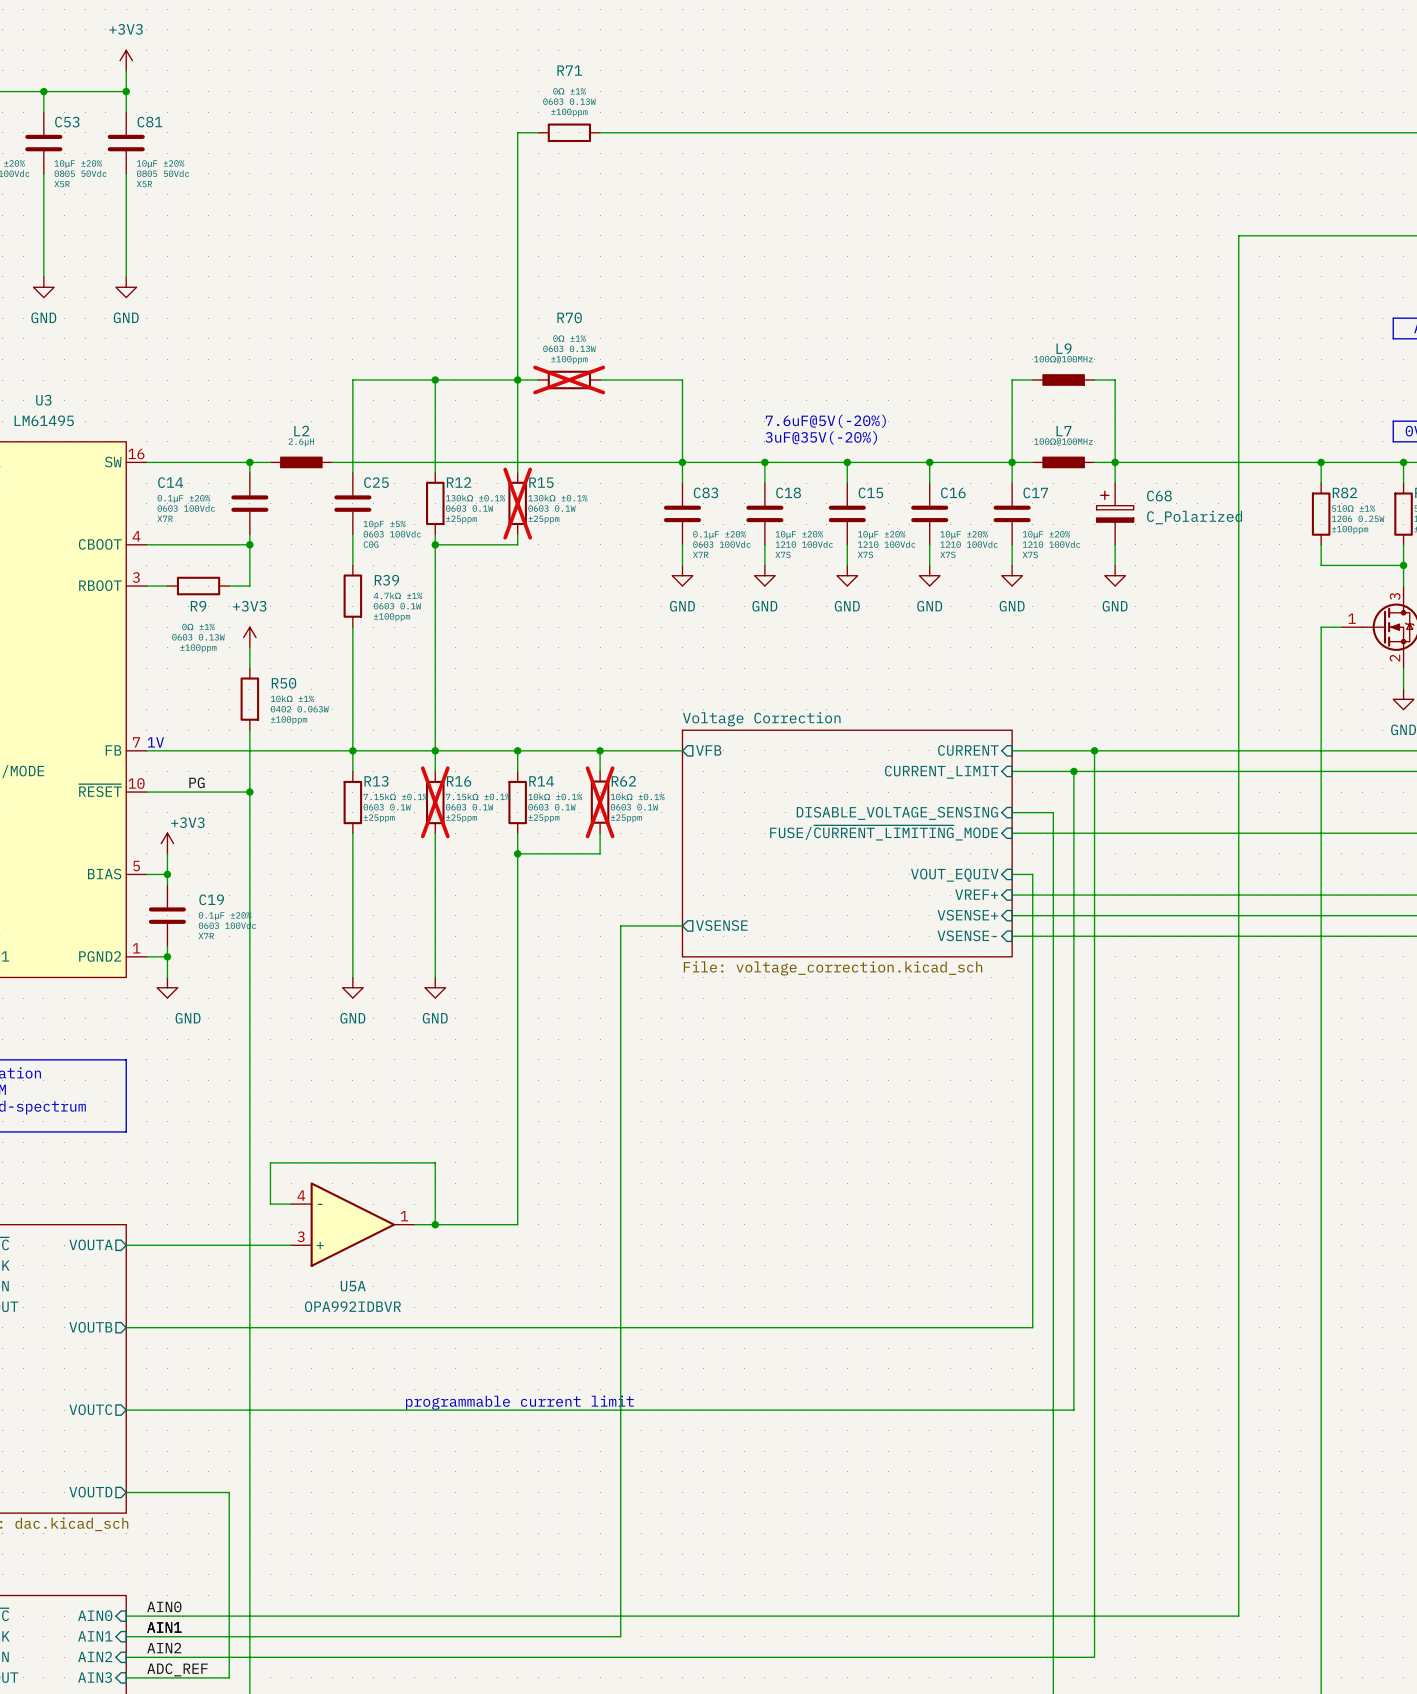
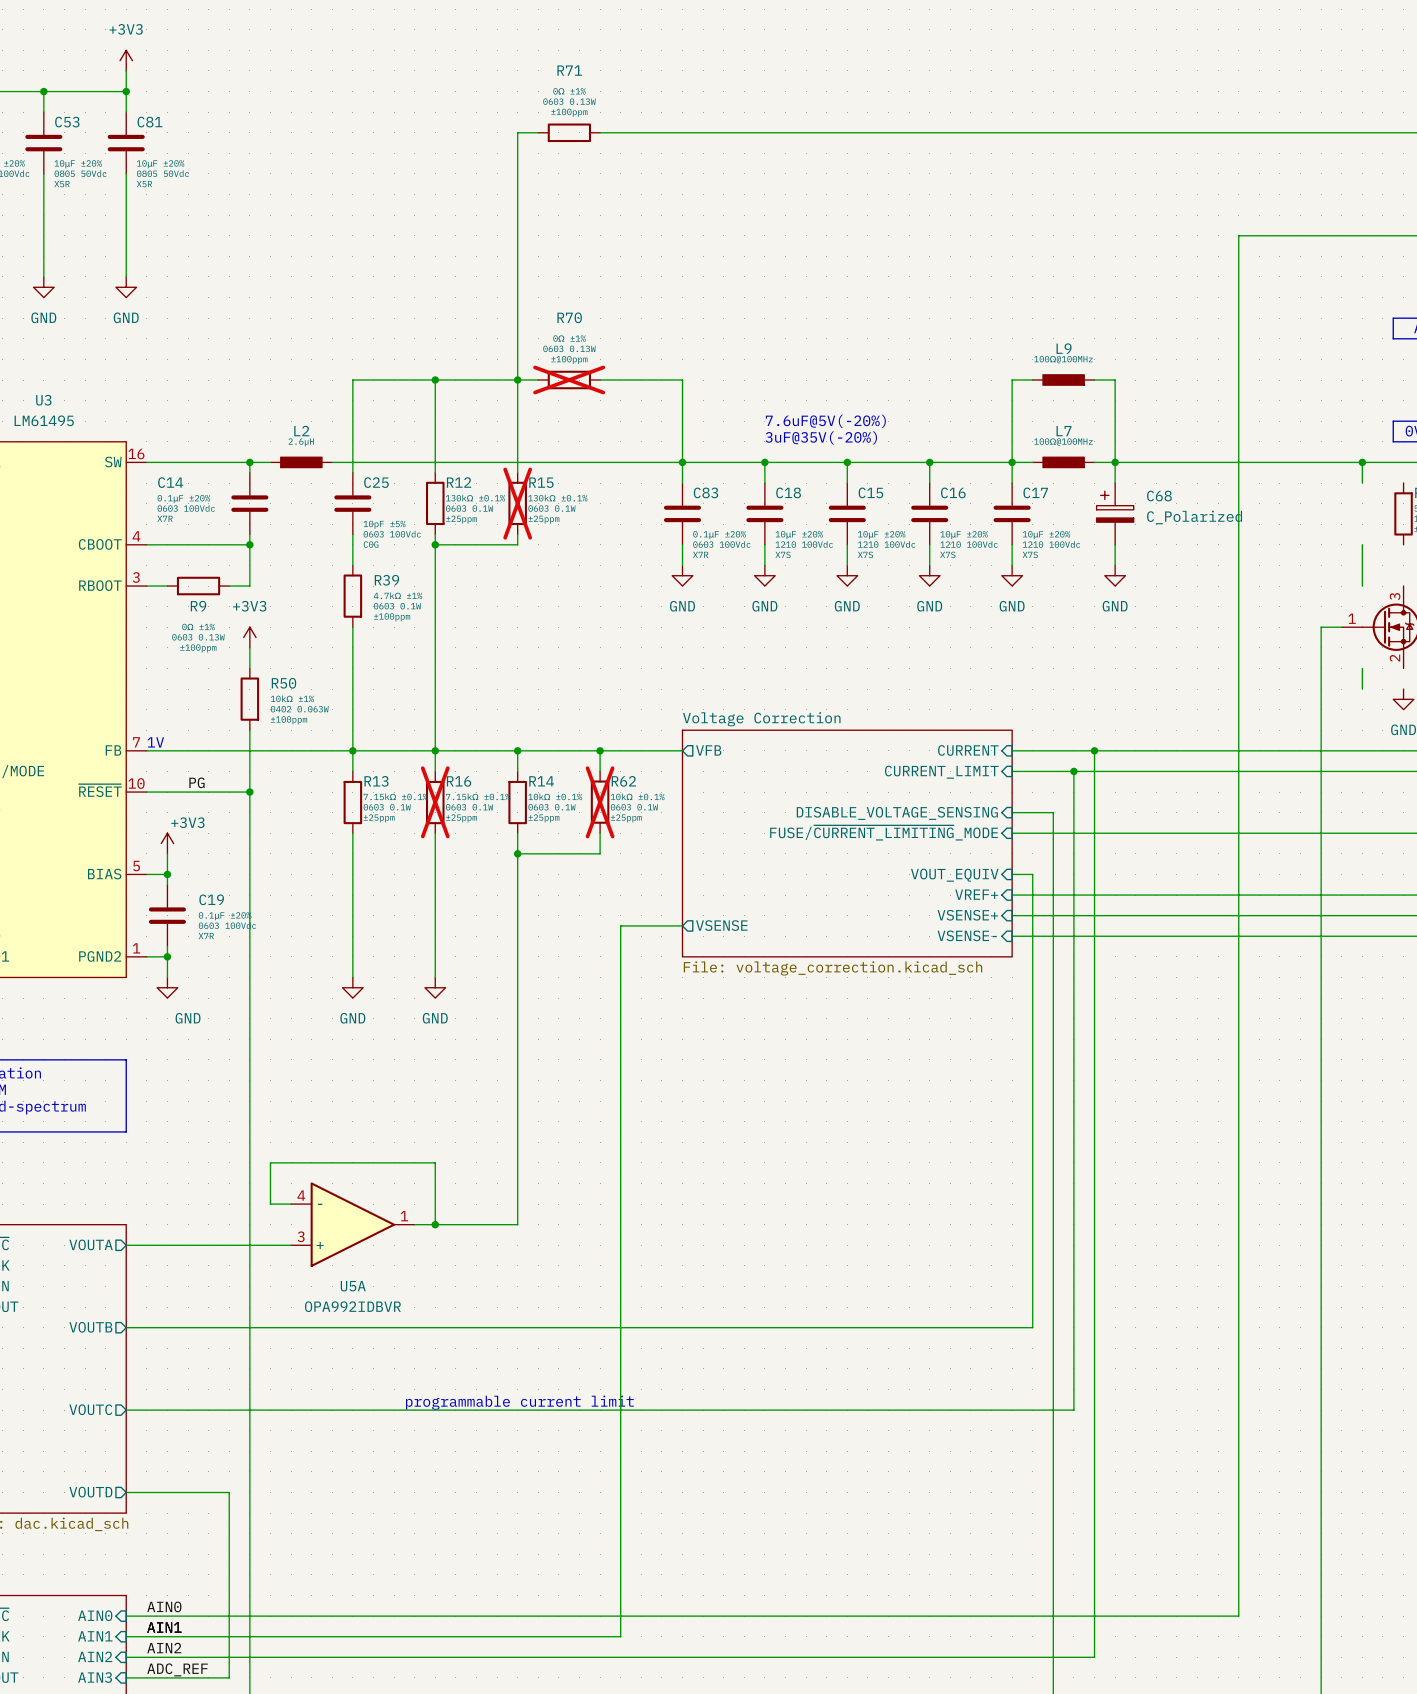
wire: (1321, 462) (1321, 483) -> none
junction: (1321, 462) -> none
junction: none -> (1362, 462)
wire: (1403, 462) (1403, 483) -> (1362, 462) (1362, 483)
junction: (1403, 462) -> none
R82: (1321, 513) -> none
wire: (1321, 544) (1321, 565) (1403, 565) -> none
wire: (1403, 544) (1403, 586) -> (1362, 544) (1362, 586)
junction: (1403, 565) -> none
wire: (1403, 668) (1403, 689) -> (1362, 668) (1362, 689)

